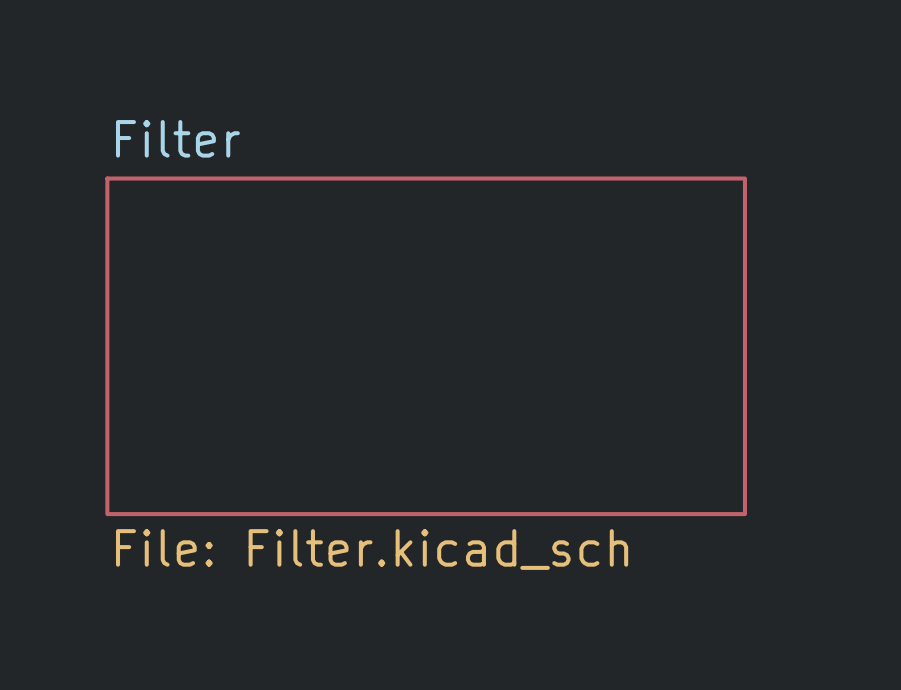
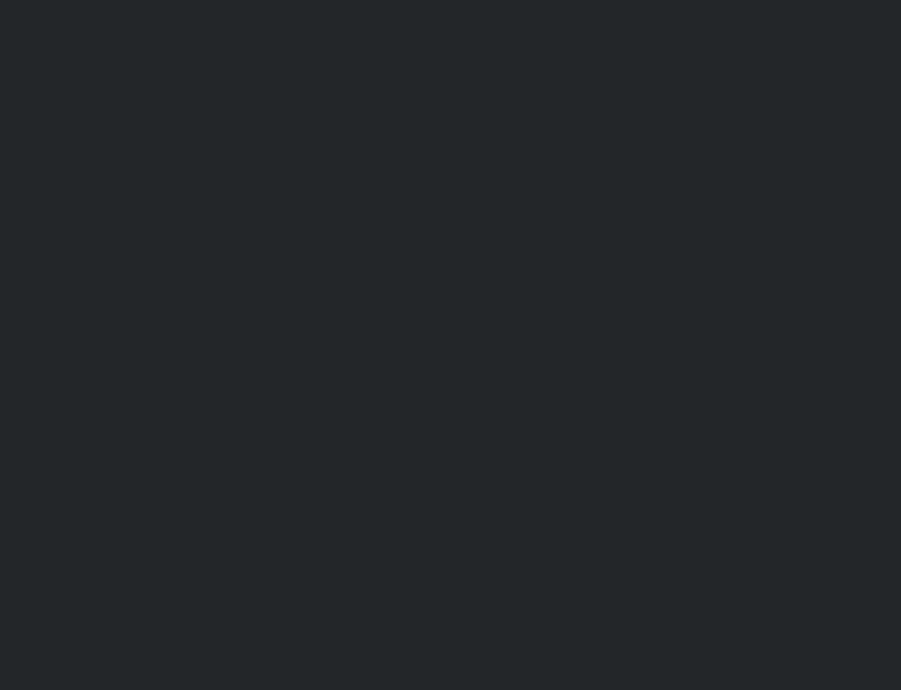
sheet Filter: File: Filter.kicad_sch (426, 346) -> none

